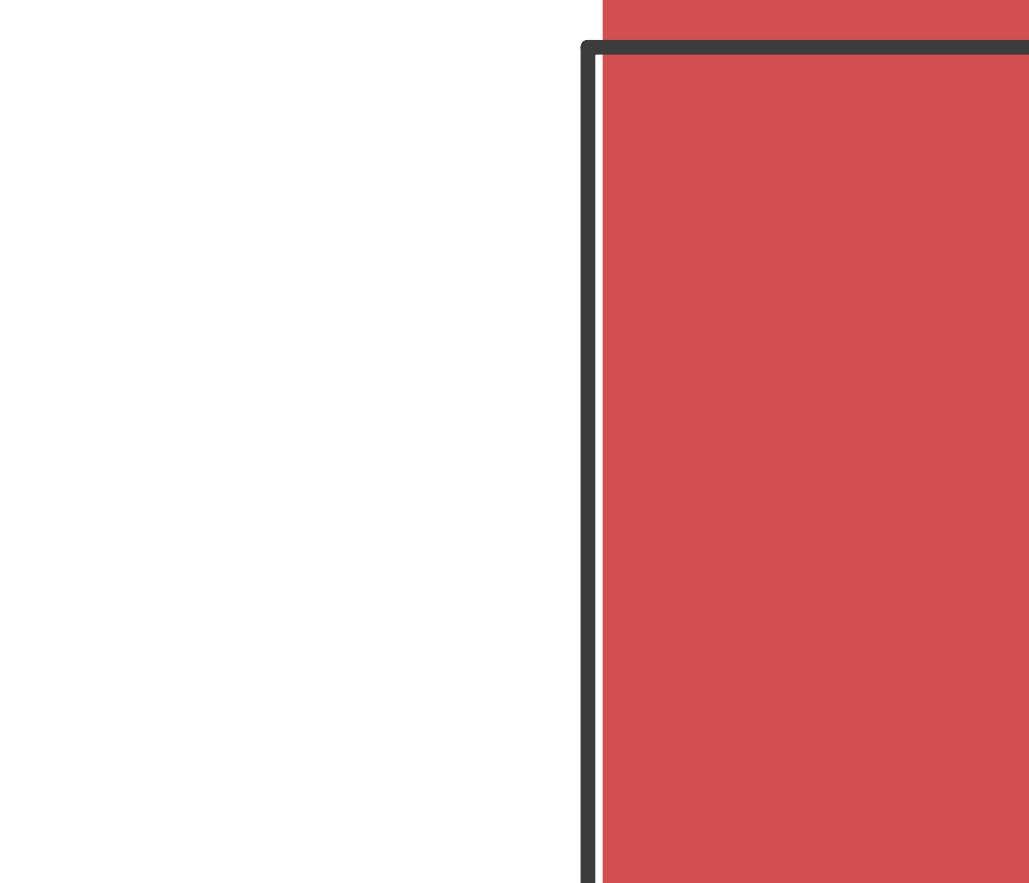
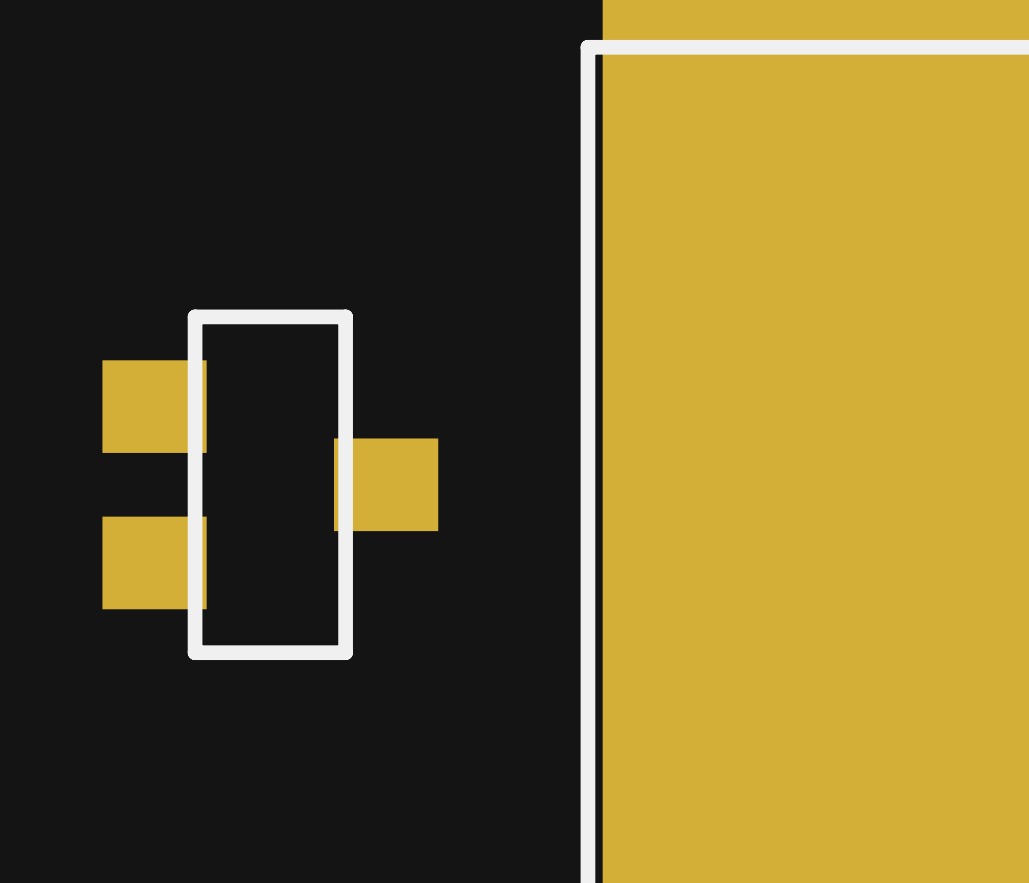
part: none -> (270, 484)

